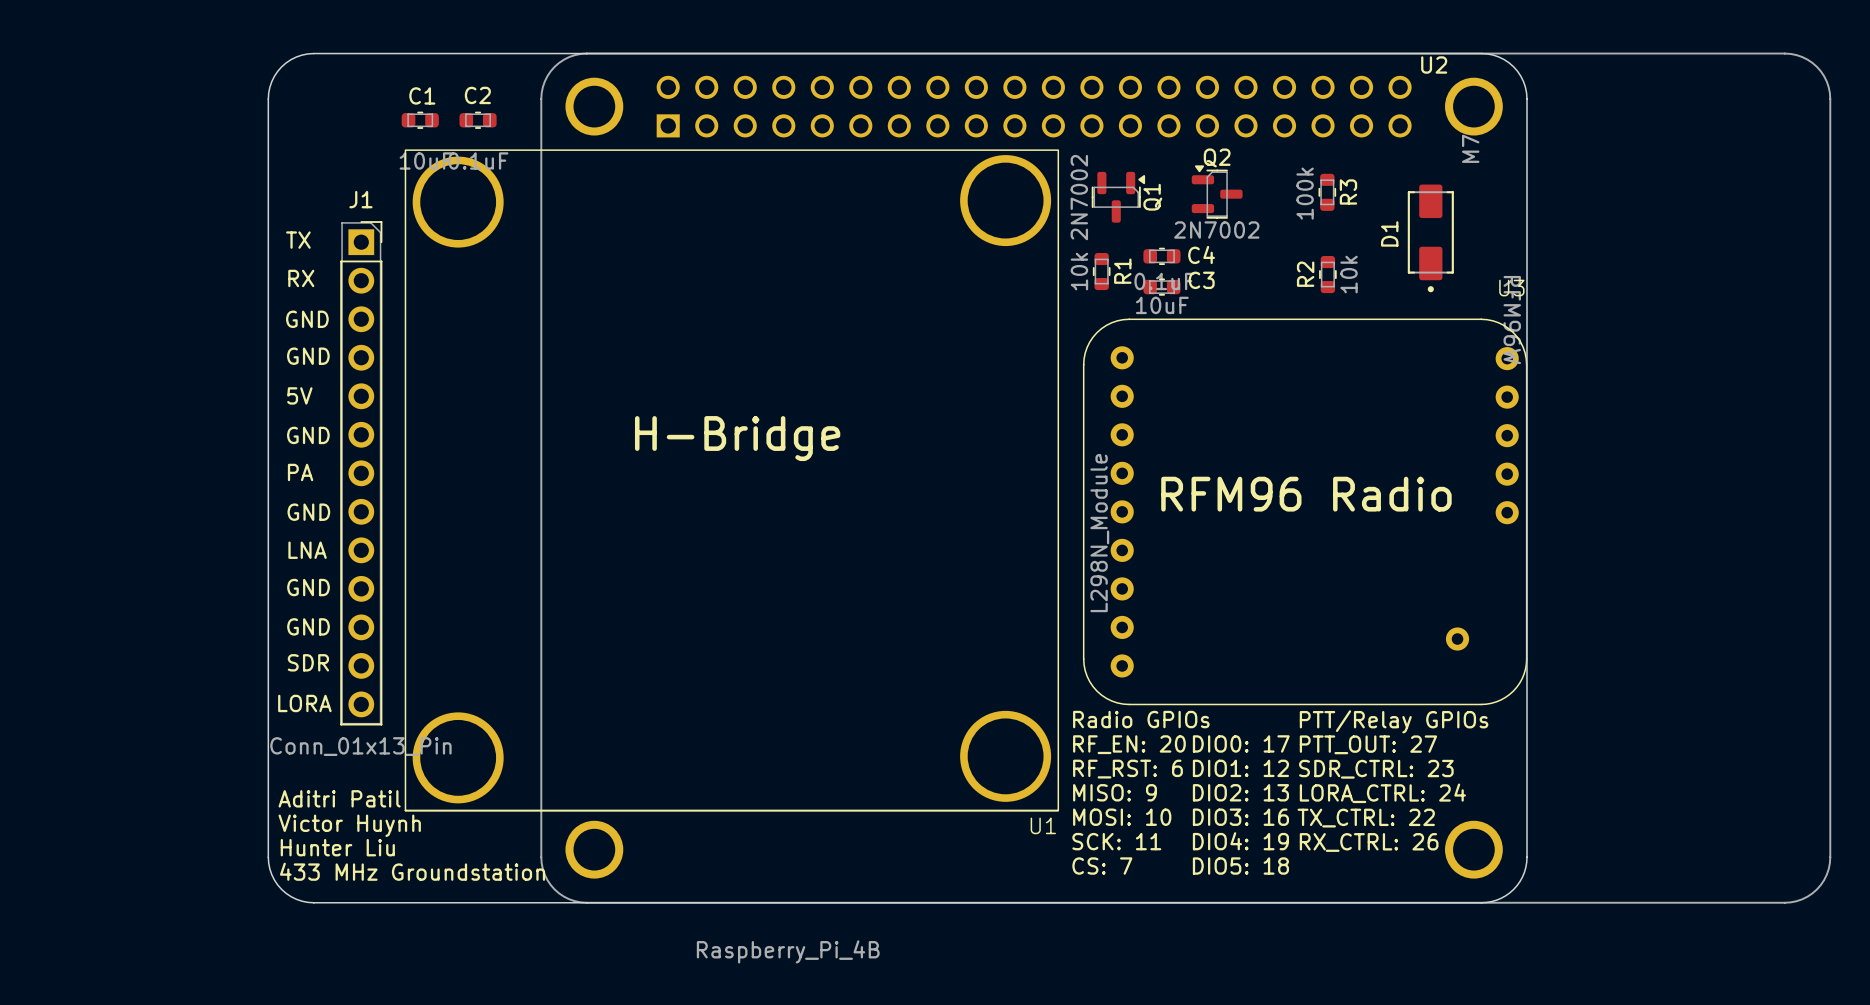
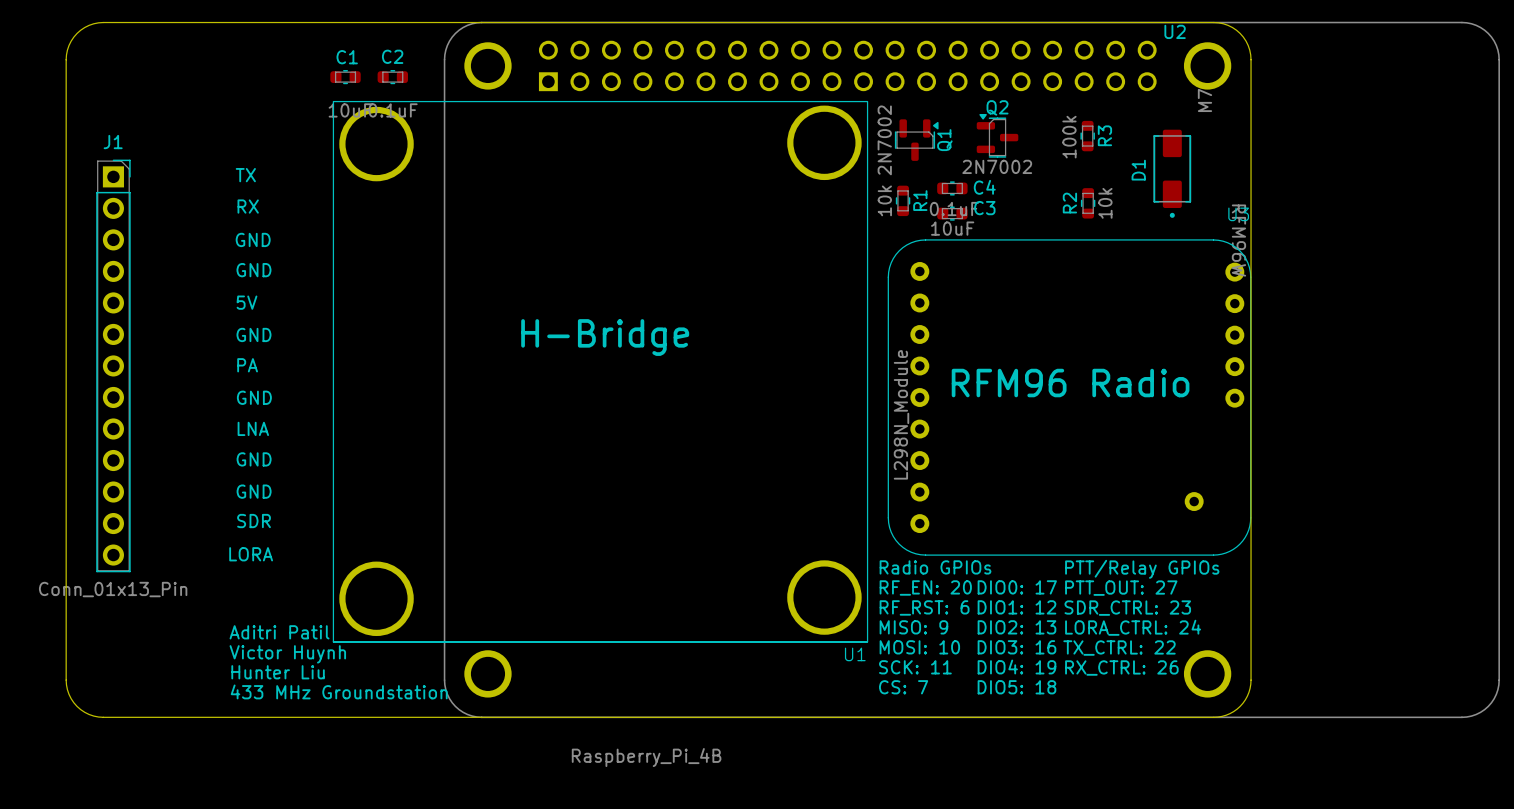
board edge: (313, 53) (296, 57) (281, 66) (271, 81) (268, 99) (268, 857) (271, 874) (281, 889) (296, 899) (313, 902) -> (258, 22) (98, 22) (84, 27) (73, 37) (67, 50) (66, 59) (67, 689) (77, 706) (84, 712) (98, 717) (258, 717)
J1 position: (361, 473) -> (113, 365)

